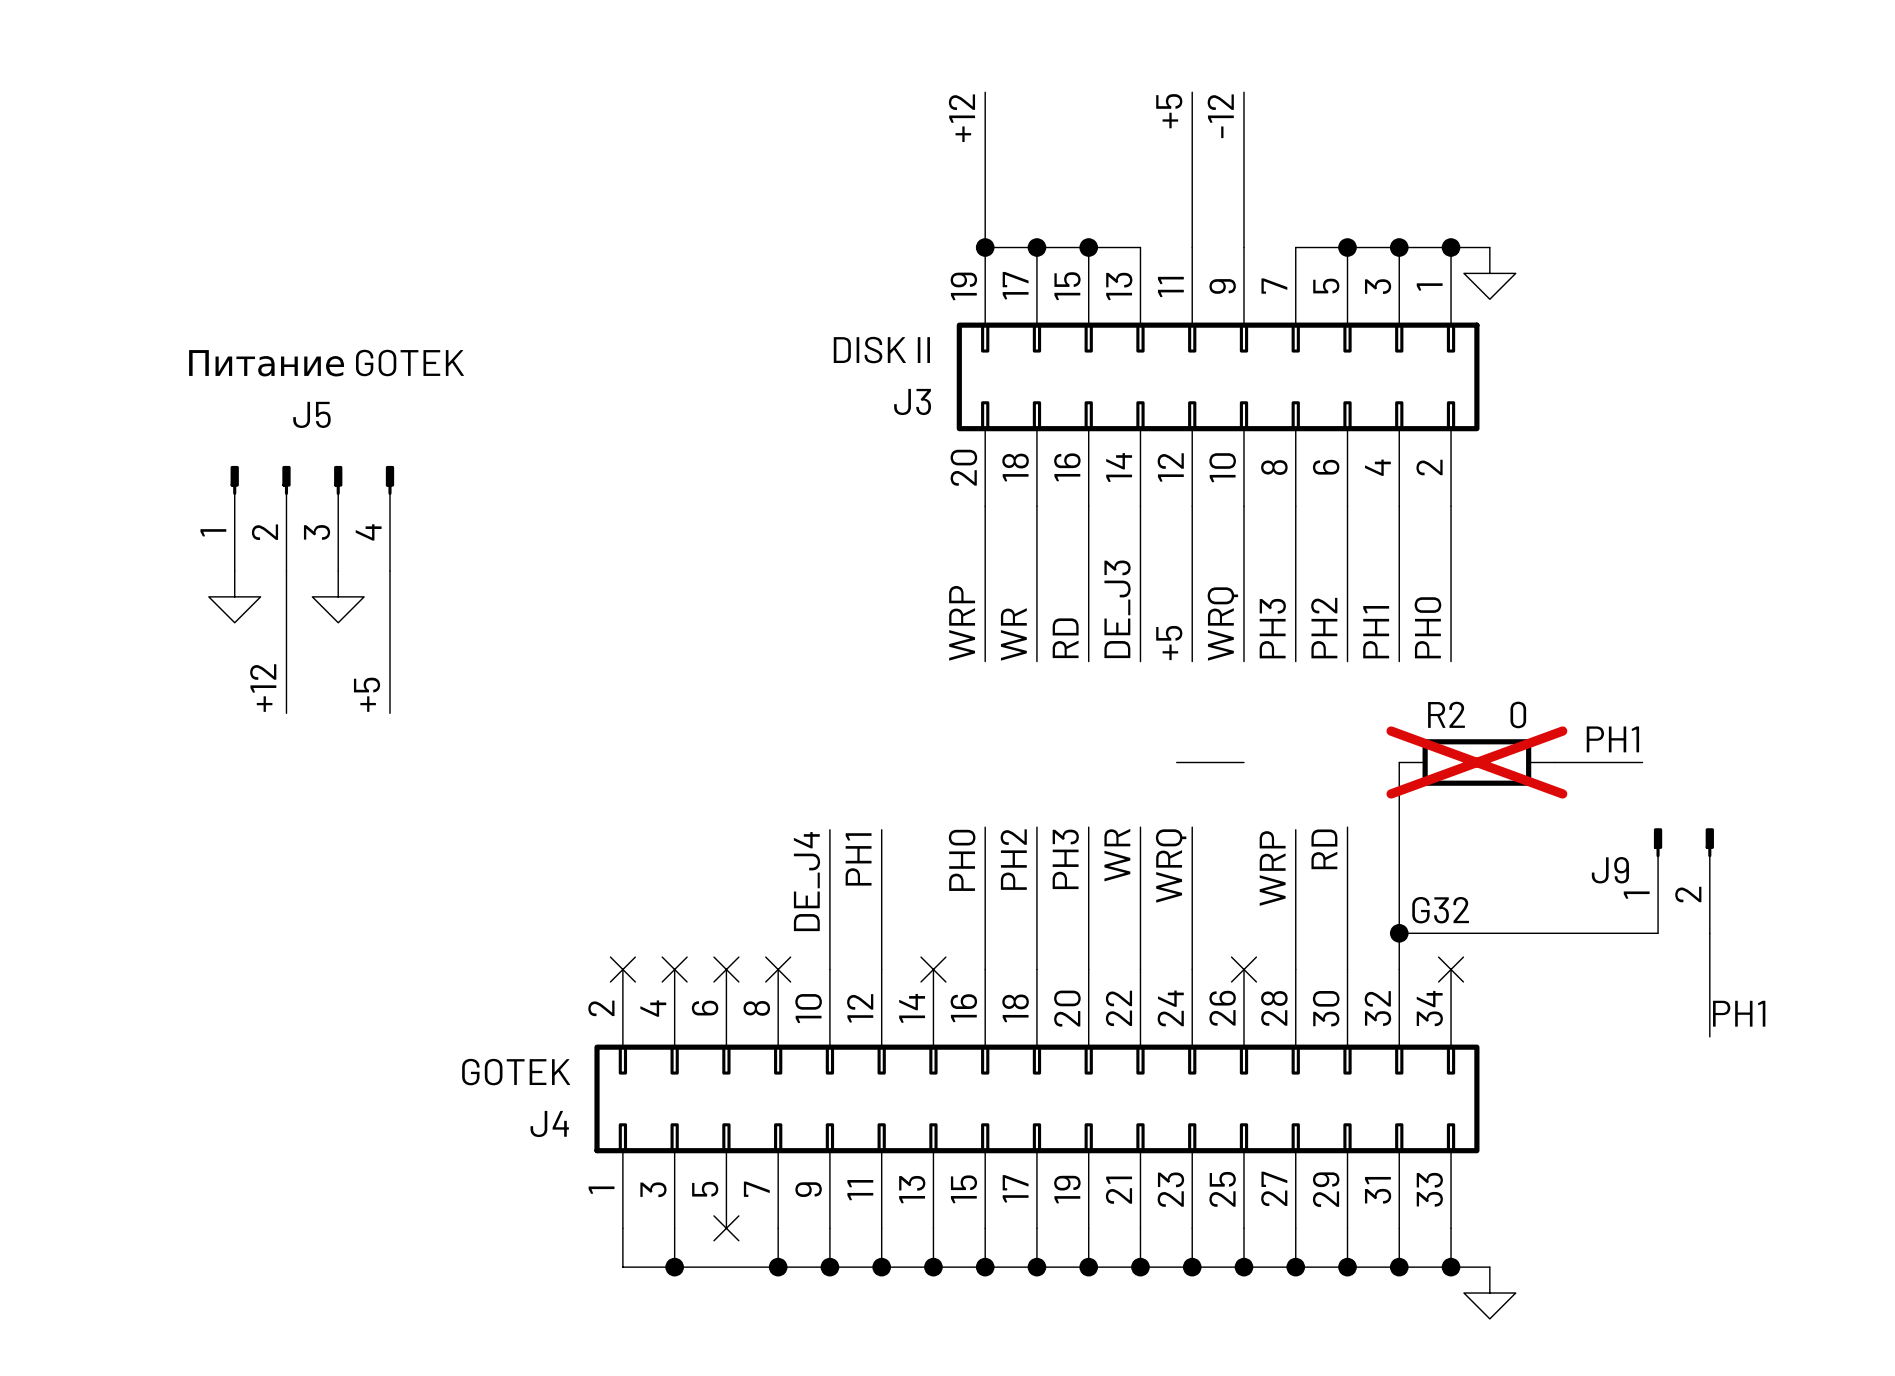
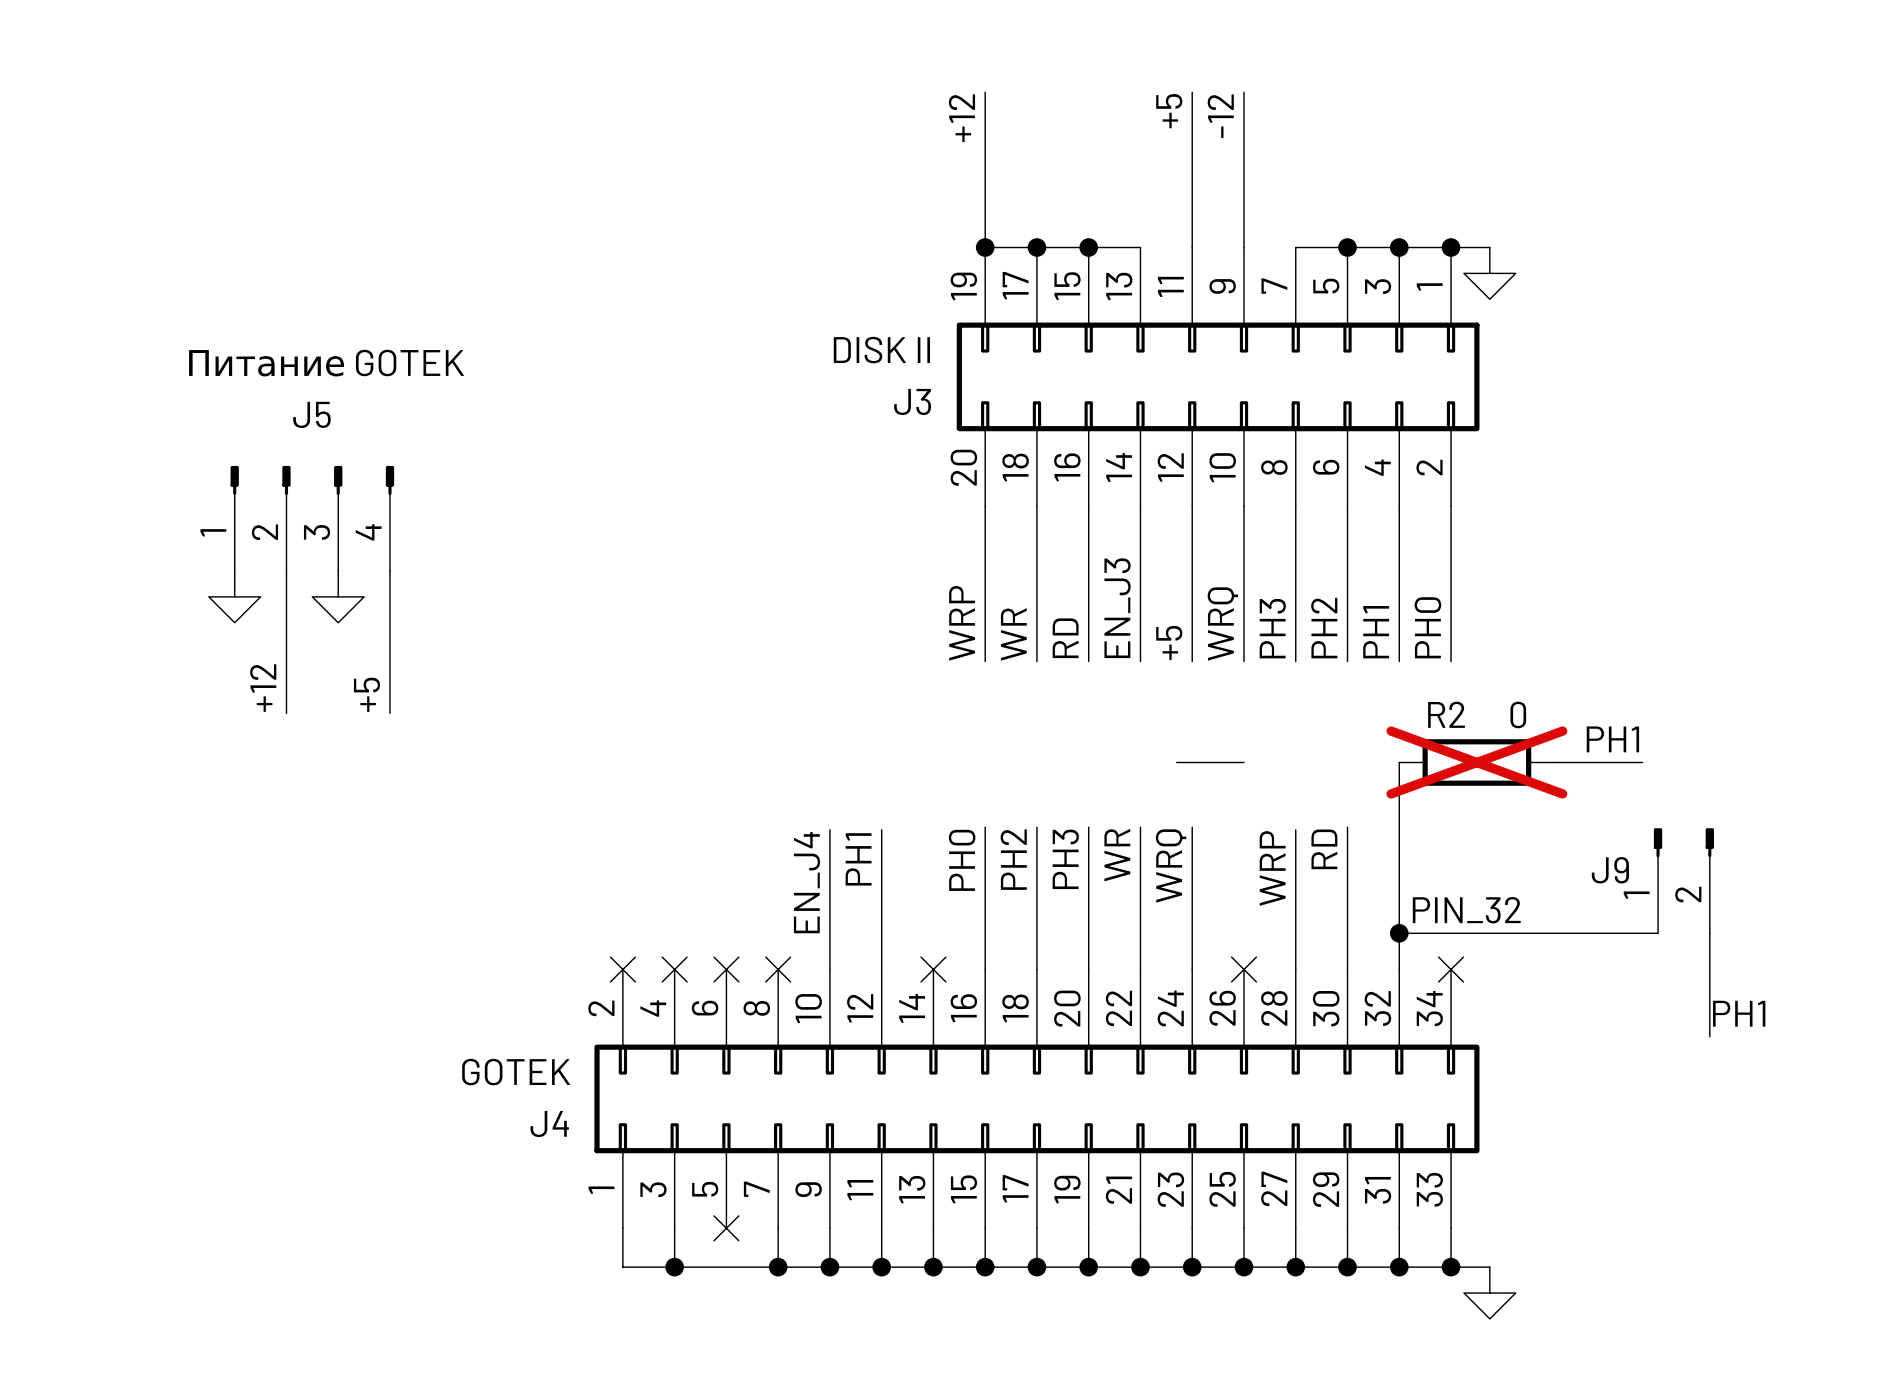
label: DE_J3 (1117, 609) -> EN_J3 (1117, 608)
label: DE_J4 (806, 881) -> EN_J4 (806, 882)
label: G32 (1440, 910) -> PIN_32 (1466, 910)

